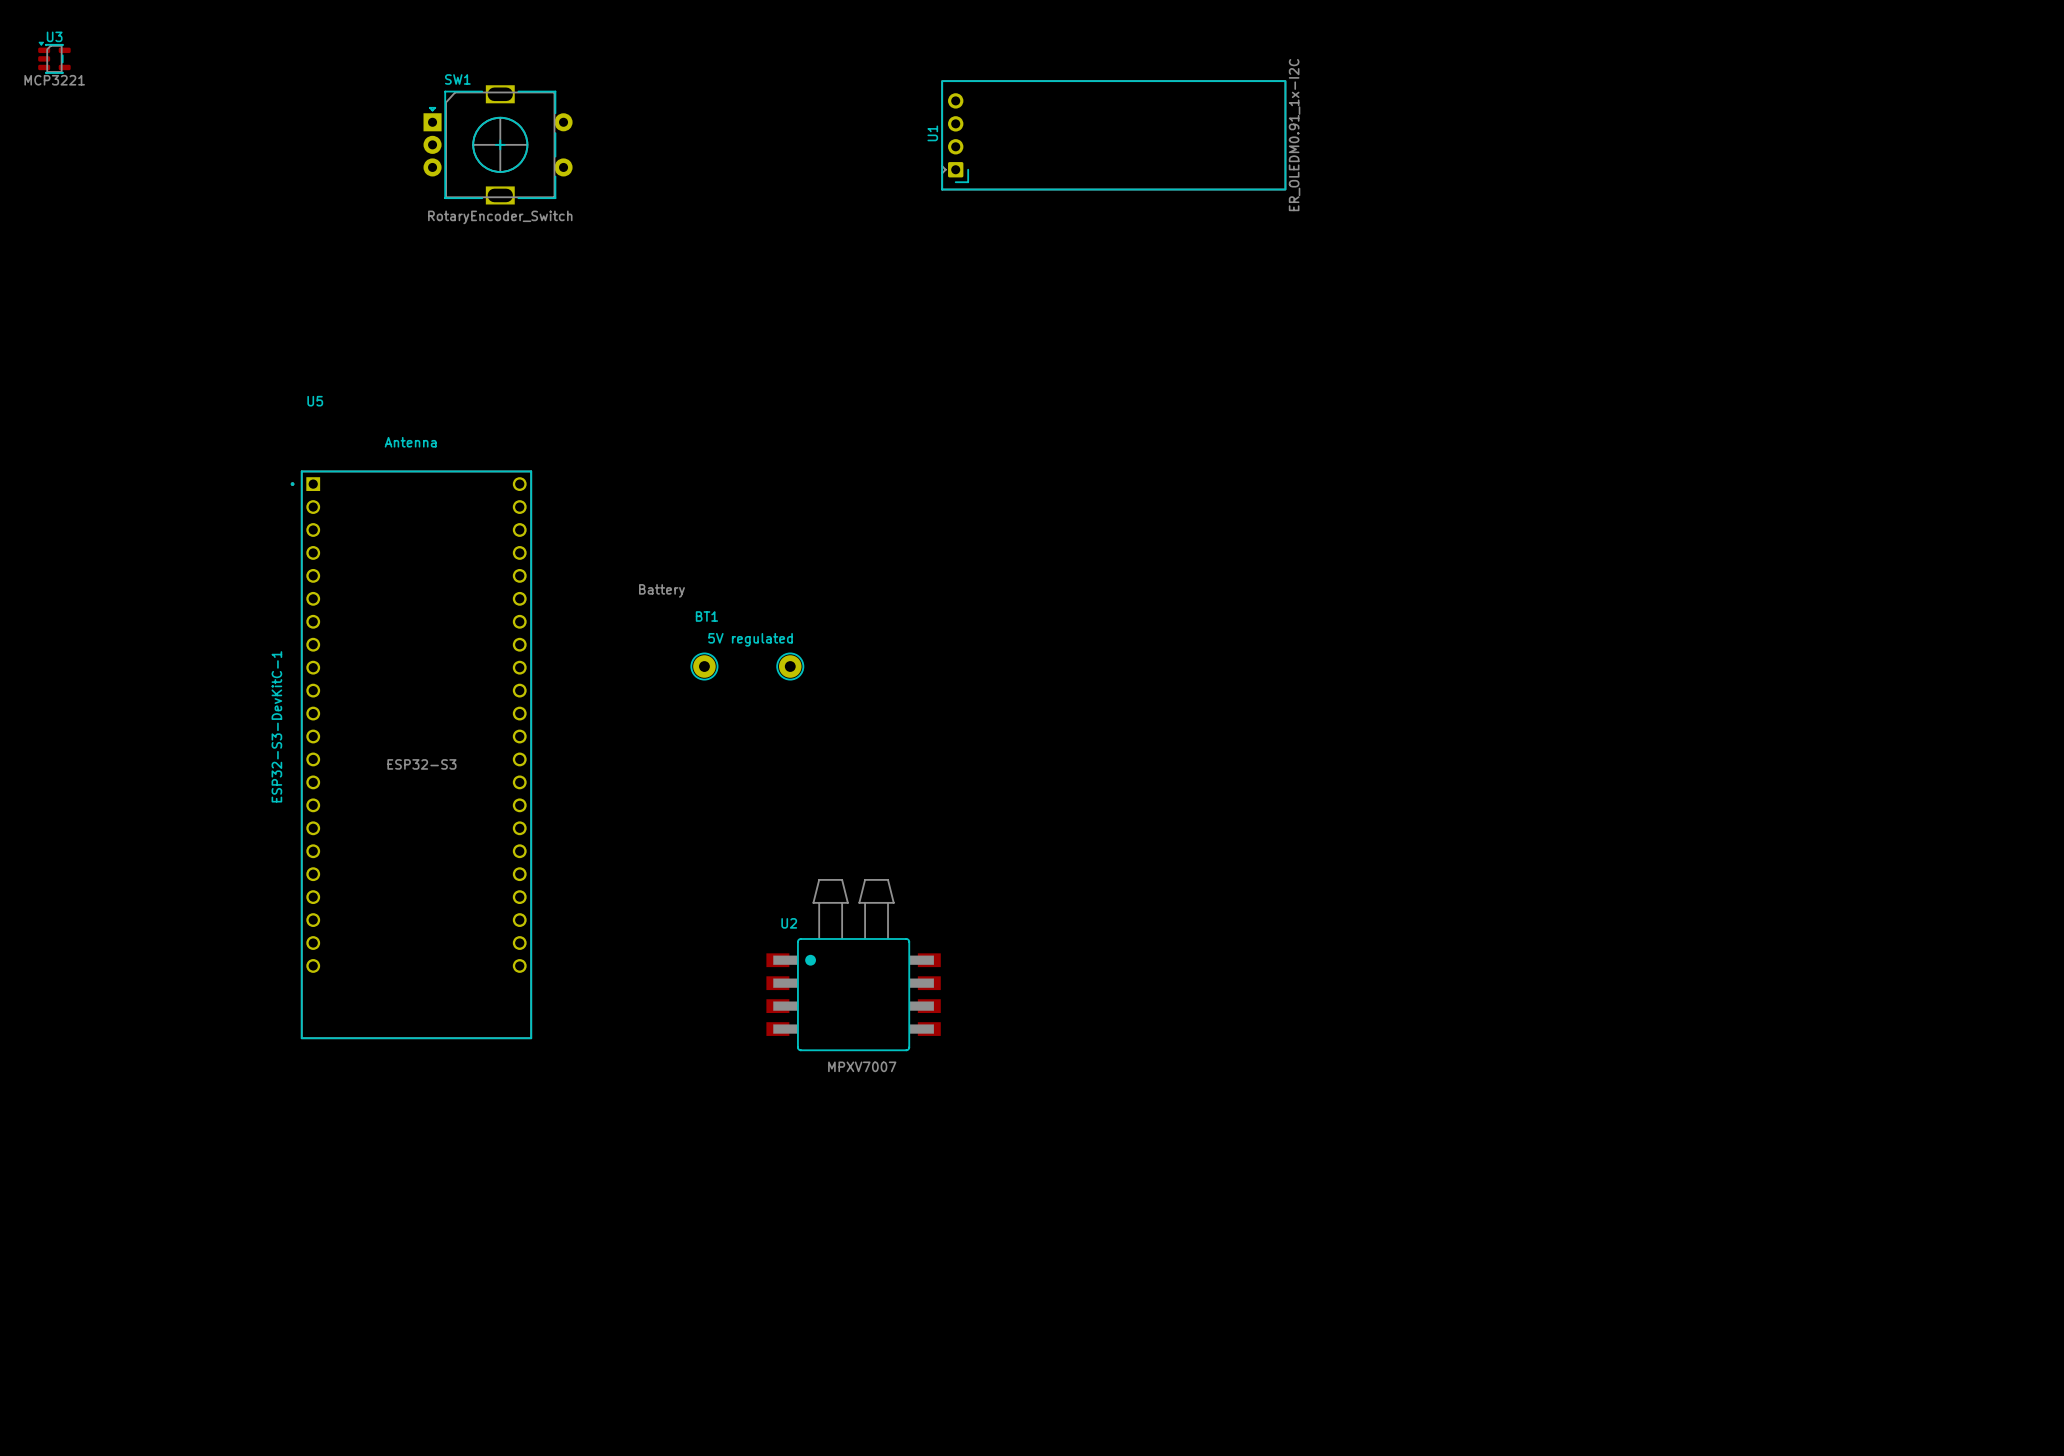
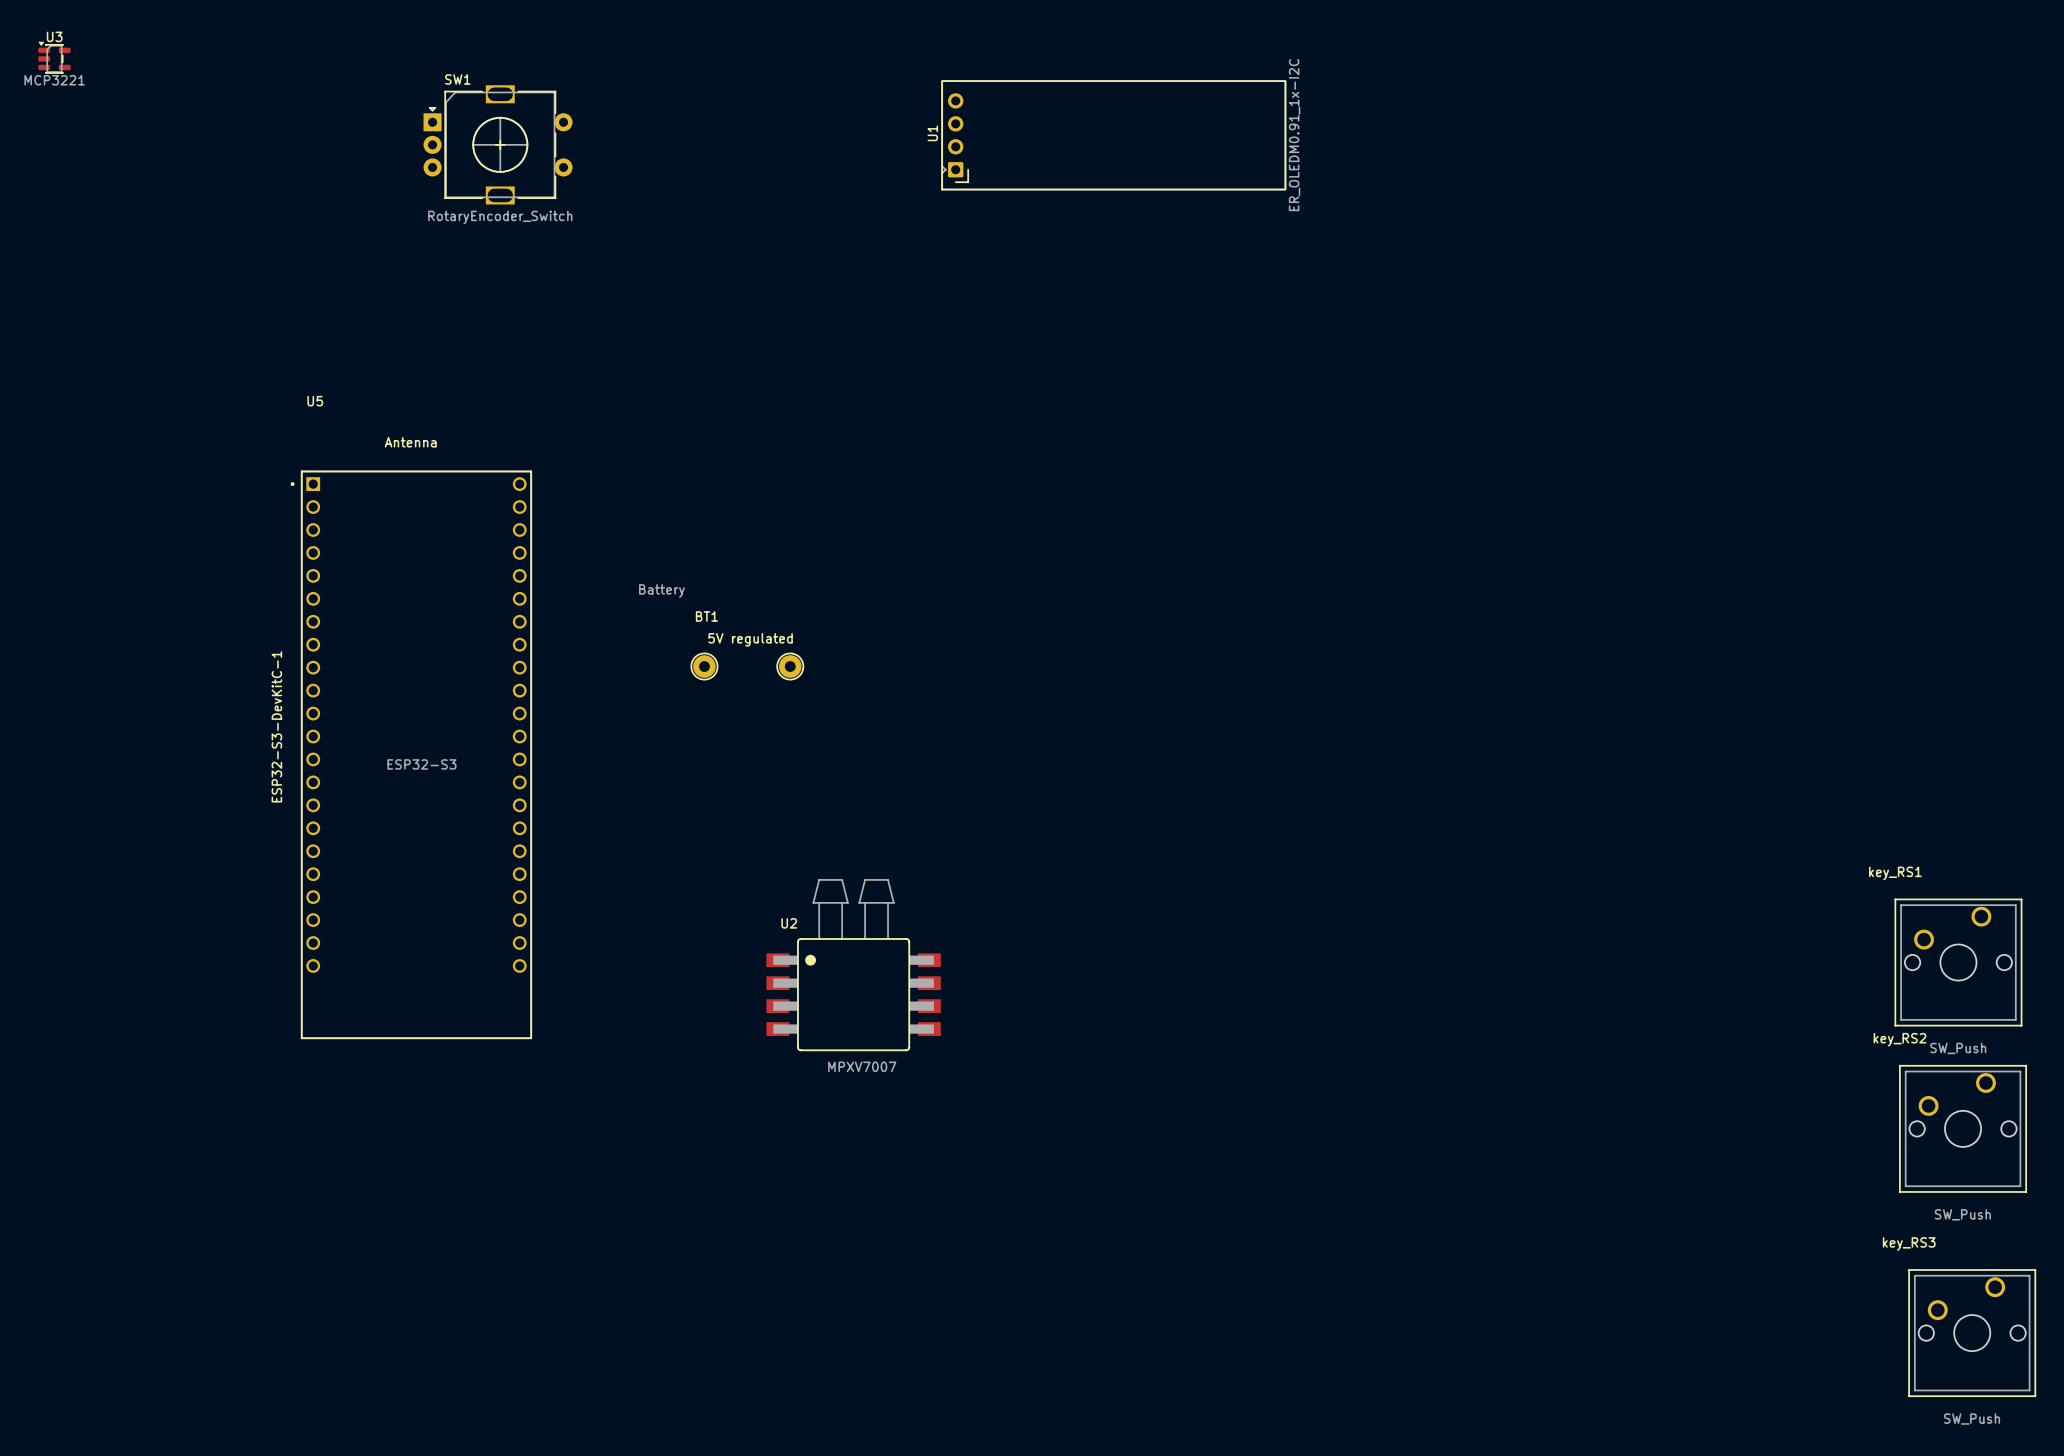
key_RS1: none -> SW_Push (1958, 962)
key_RS2: none -> SW_Push (1963, 1128)
key_RS3: none -> SW_Push (1972, 1333)

